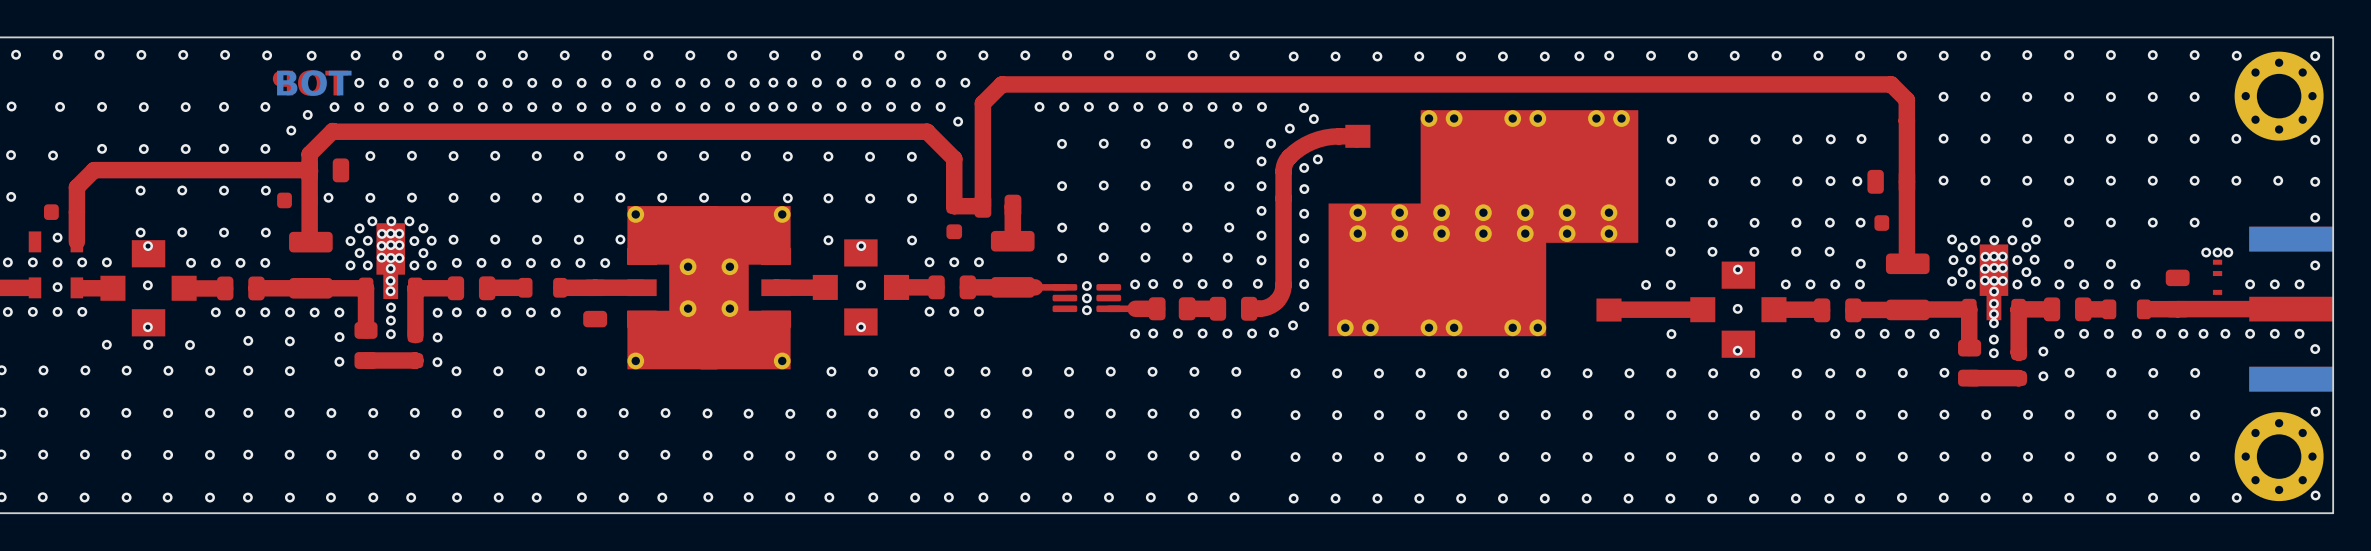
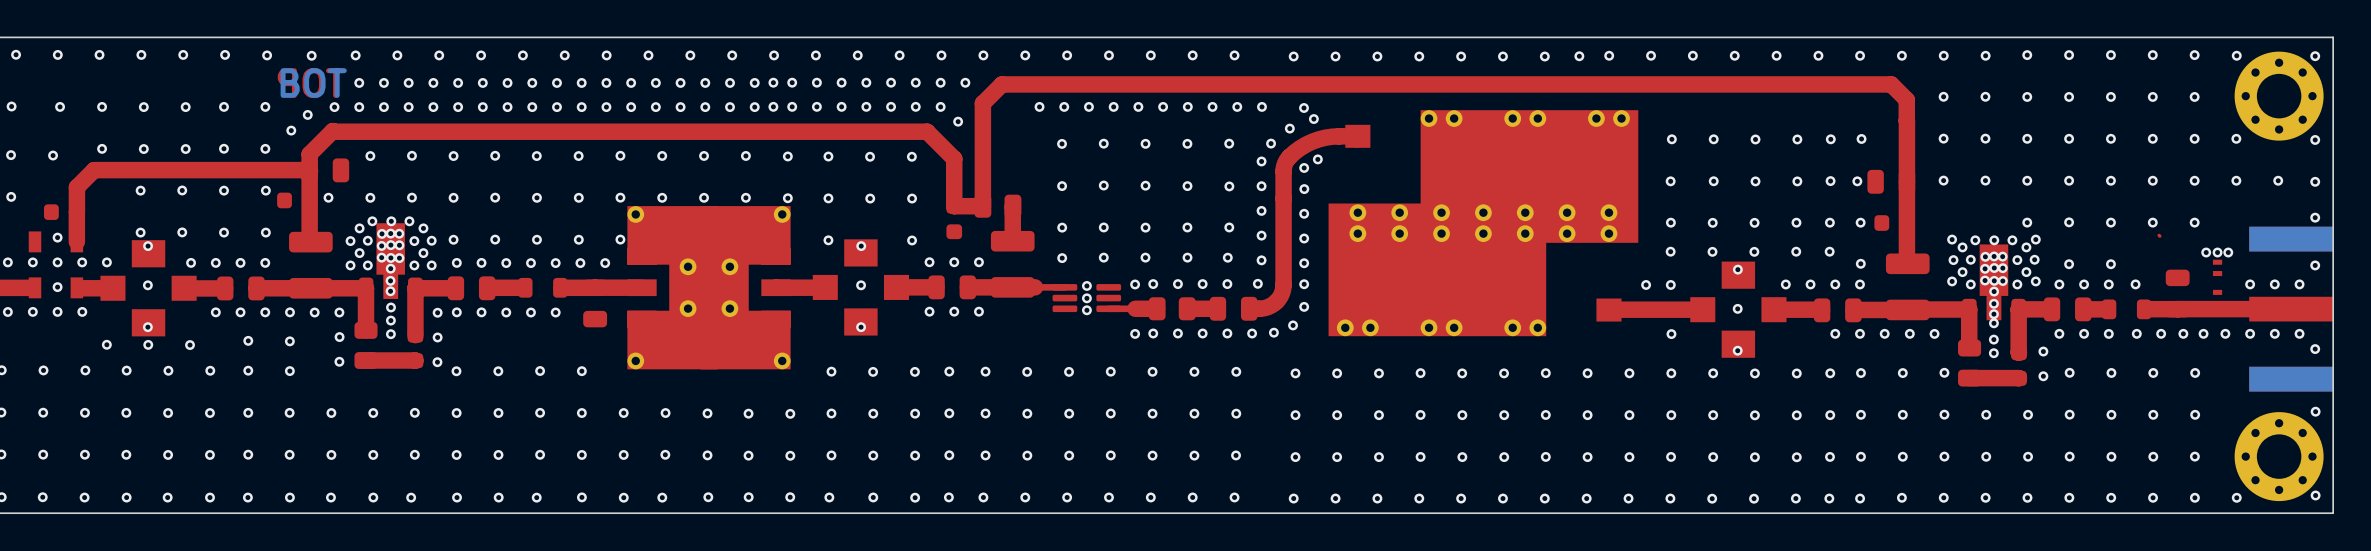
top track: none -> (2159, 235) (2159, 236)

